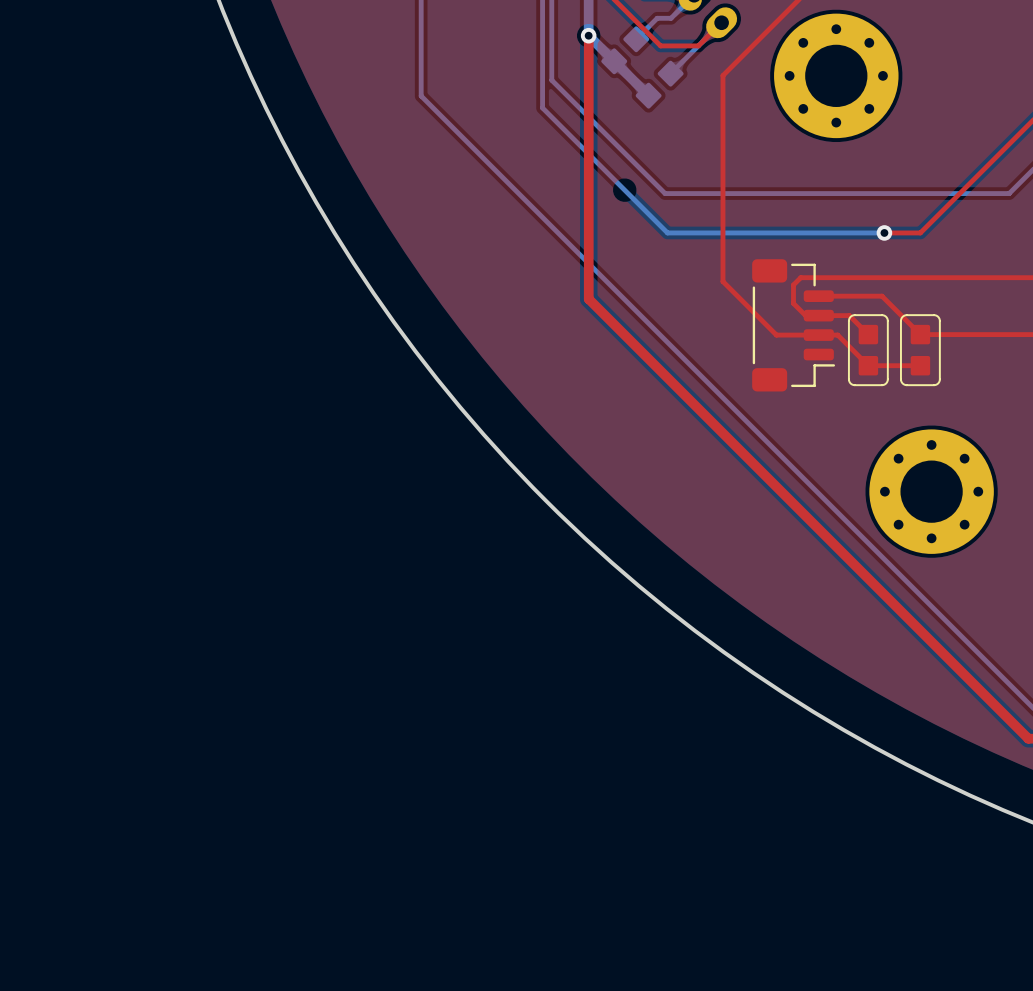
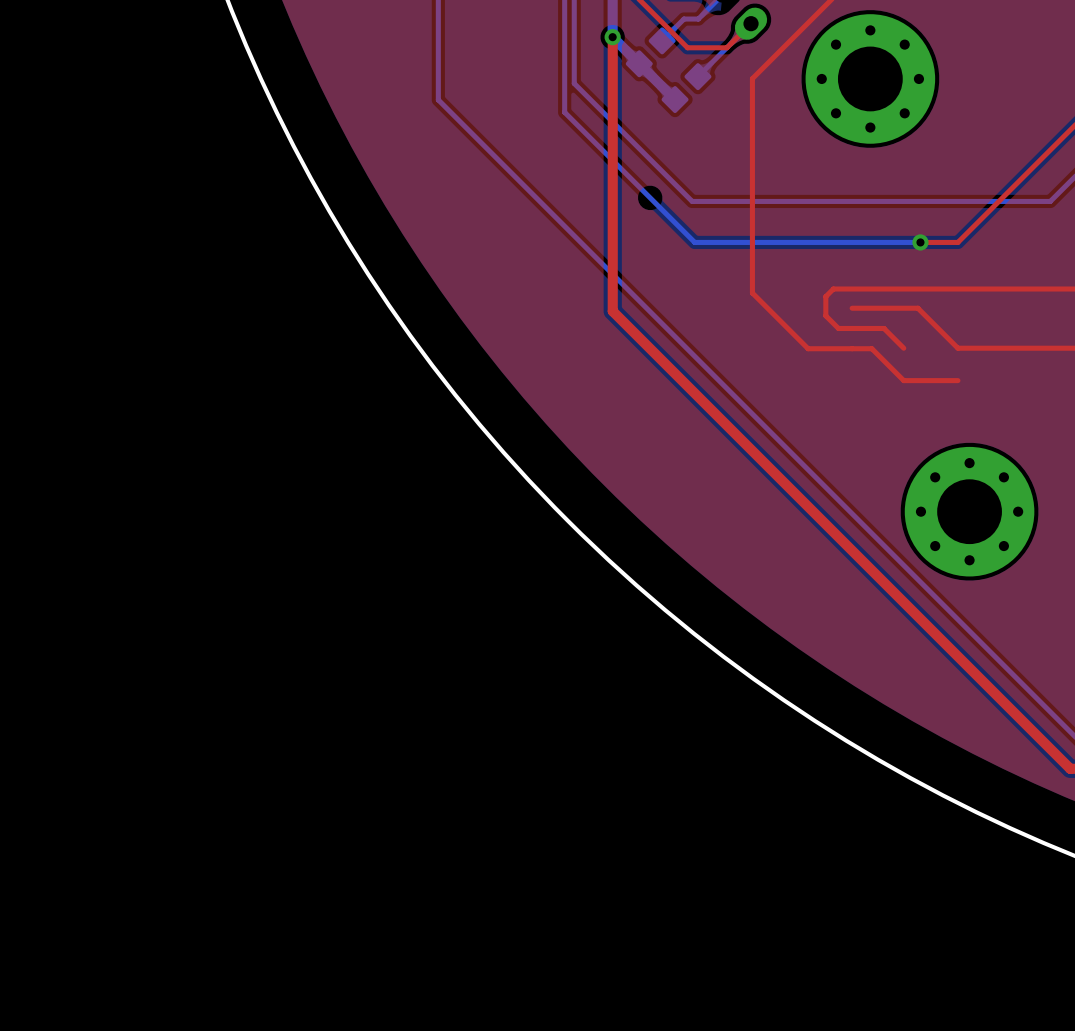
part: (793, 325) -> none
part: (868, 350) -> none
part: (920, 350) -> none

